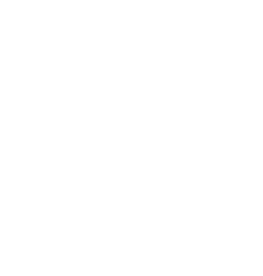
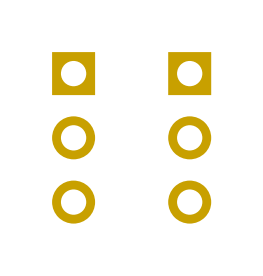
part: none -> (73, 137)
part: none -> (189, 137)

